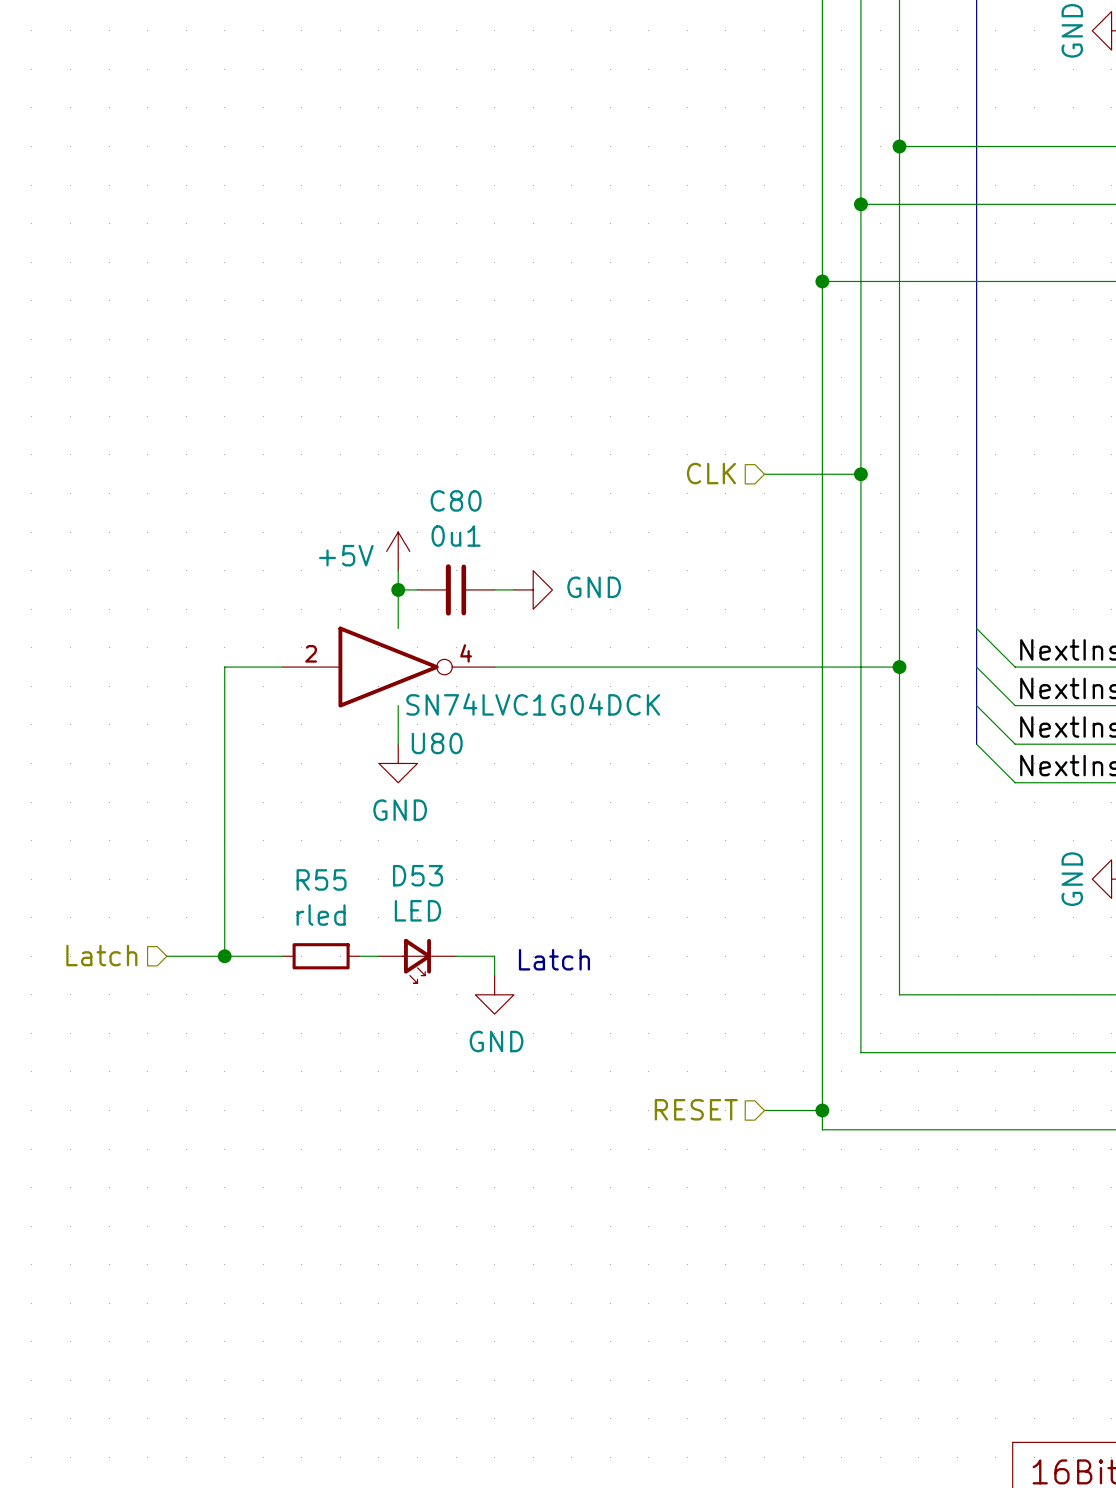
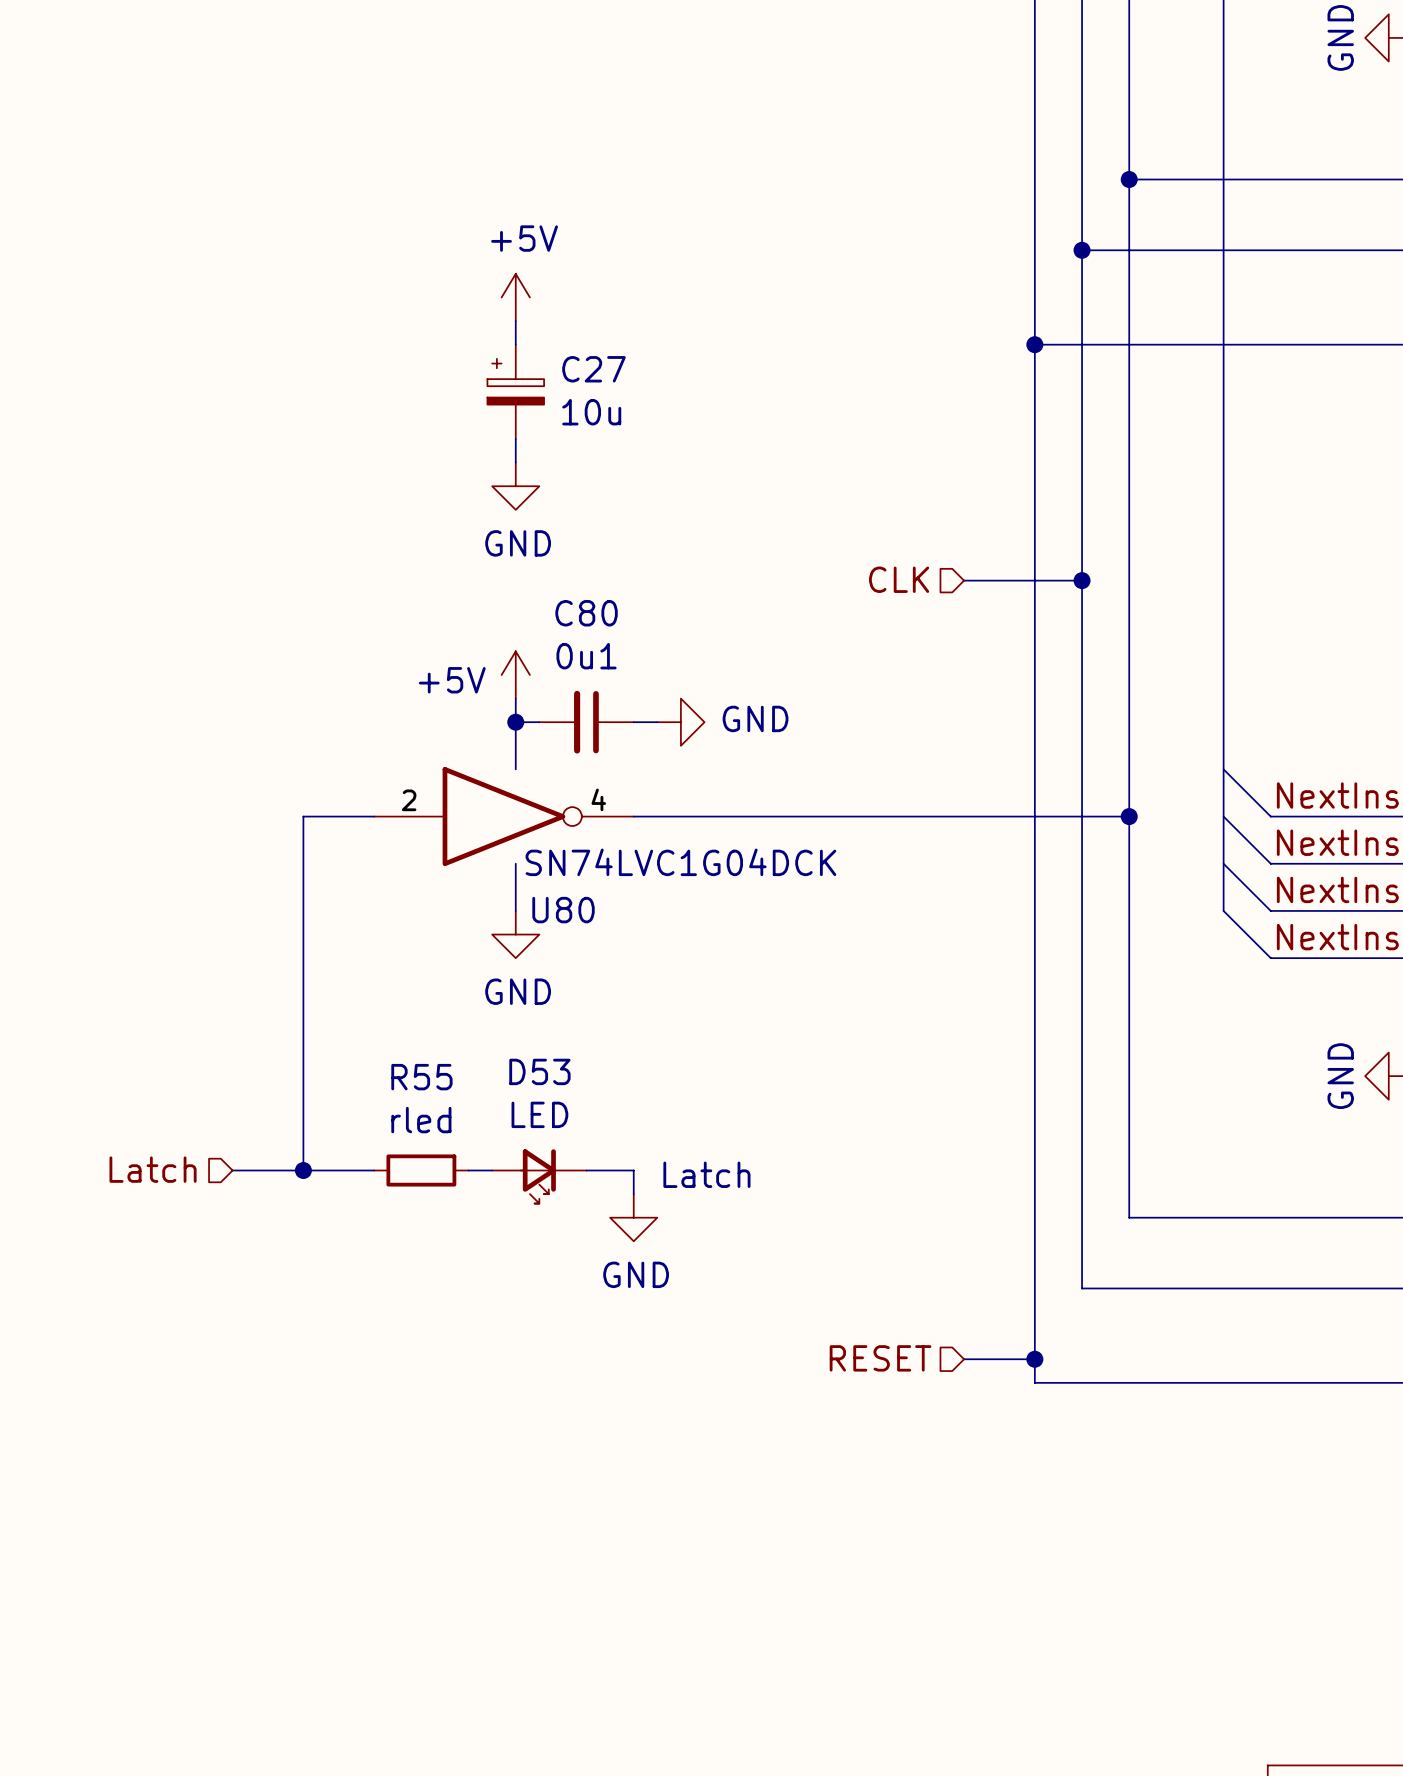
power symbol: none -> +5V (515, 297)
wire: none -> (515, 321) (515, 344)
C27: none -> 10u (515, 391)
wire: none -> (515, 439) (515, 462)
power symbol: none -> GND (515, 486)

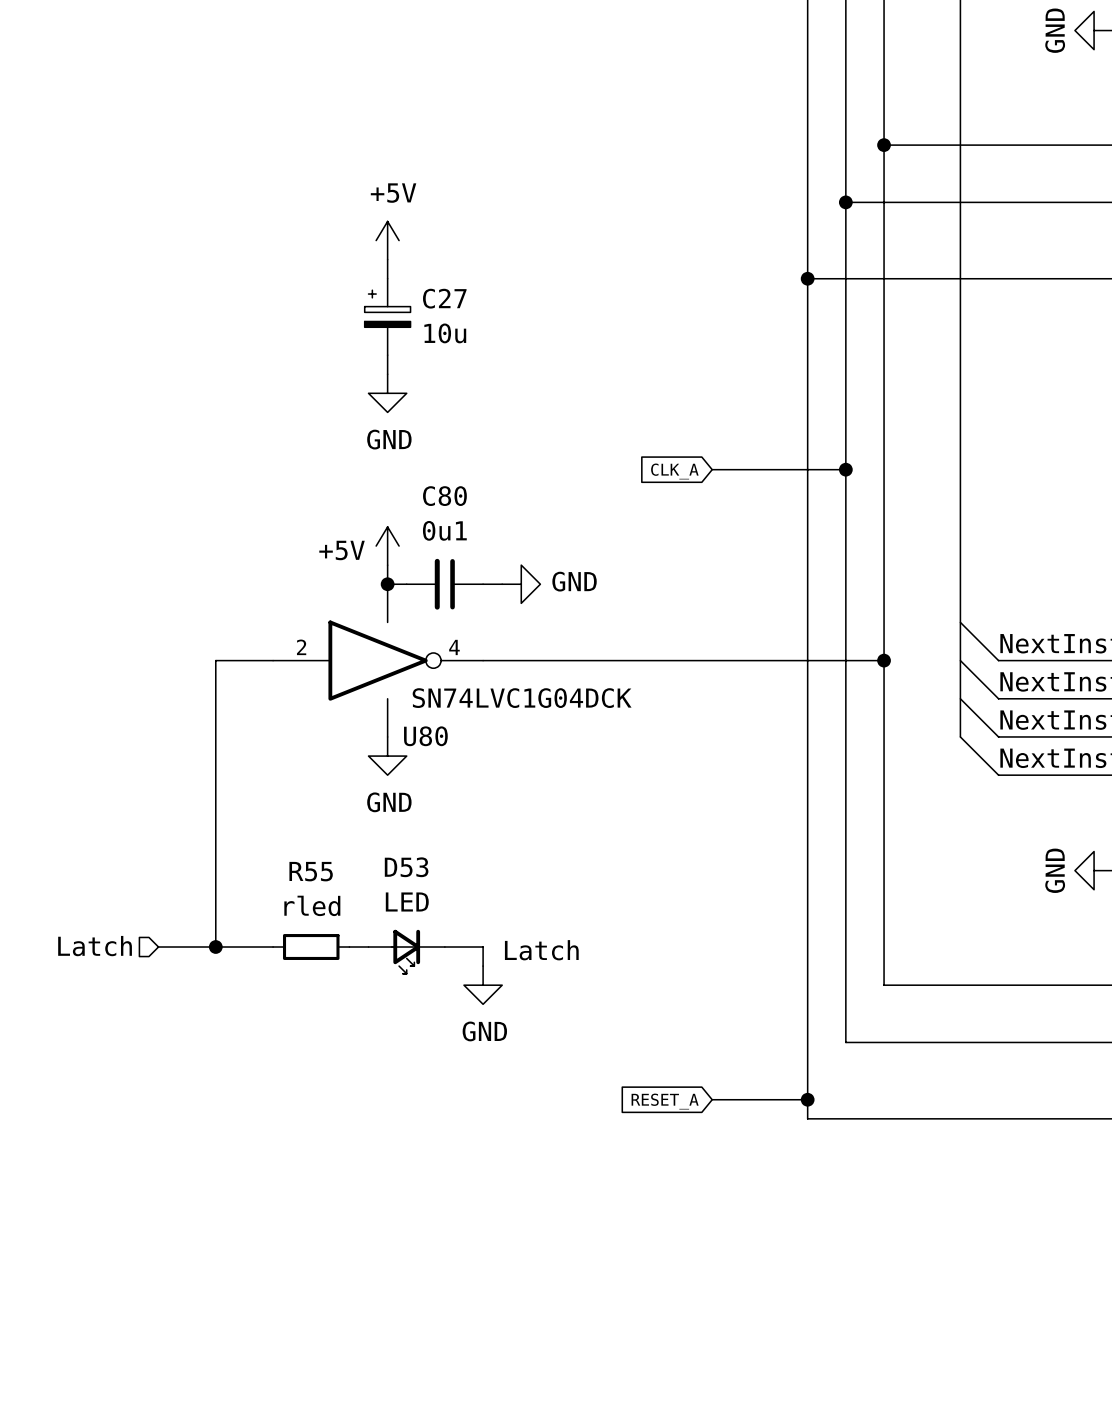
hierarchical label: CLK (899, 579) -> none
wire: none -> (712, 469) (750, 469)
global label: none -> CLK_A (674, 471)
hierarchical label: RESET (880, 1358) -> none
global label: none -> RESET_A (665, 1101)
wire: none -> (712, 1099) (750, 1099)

